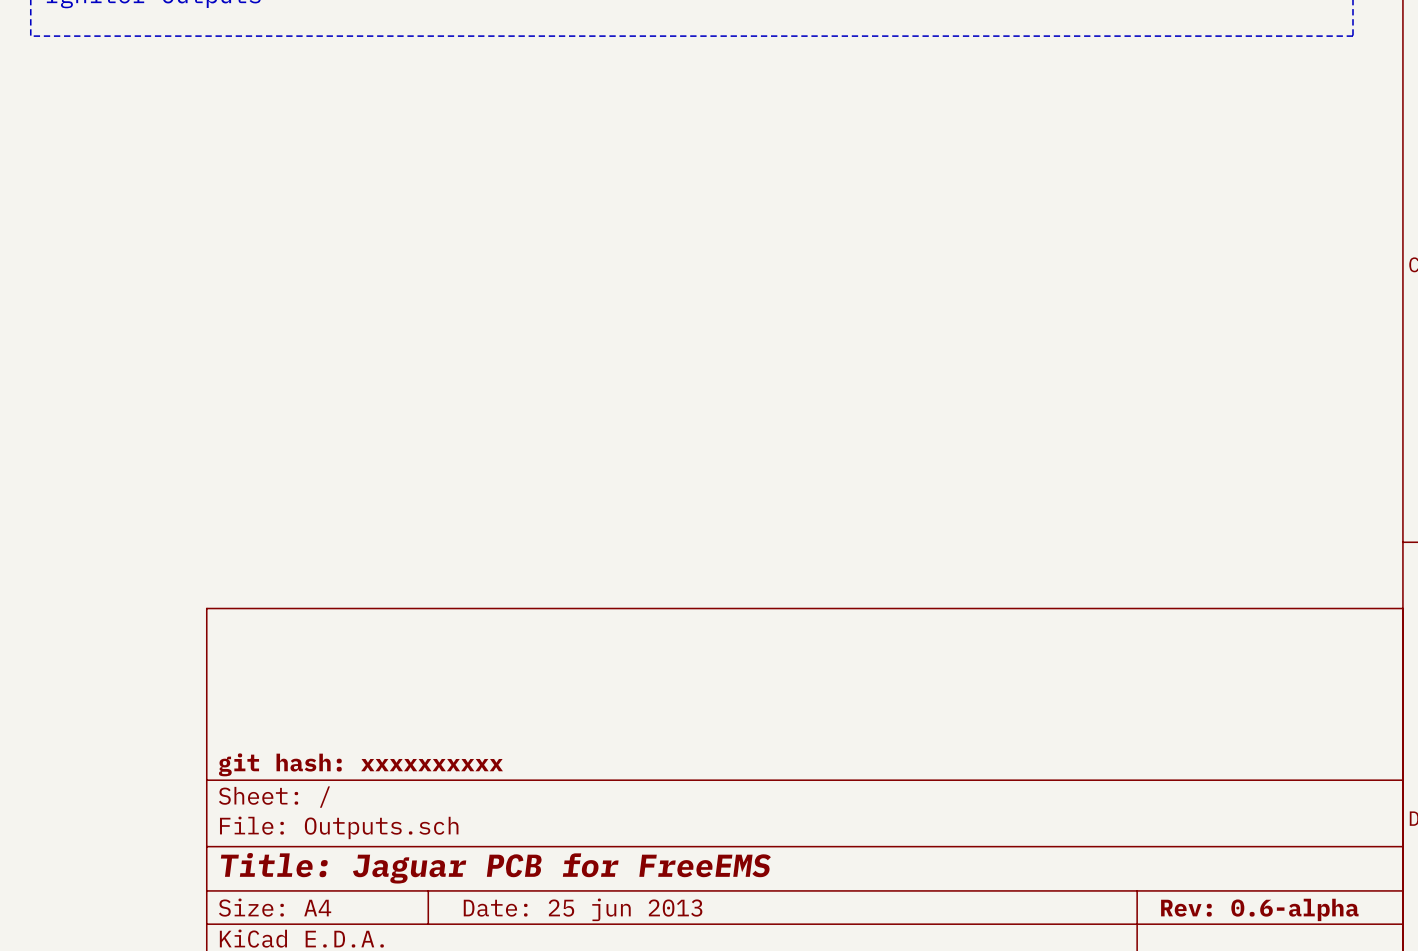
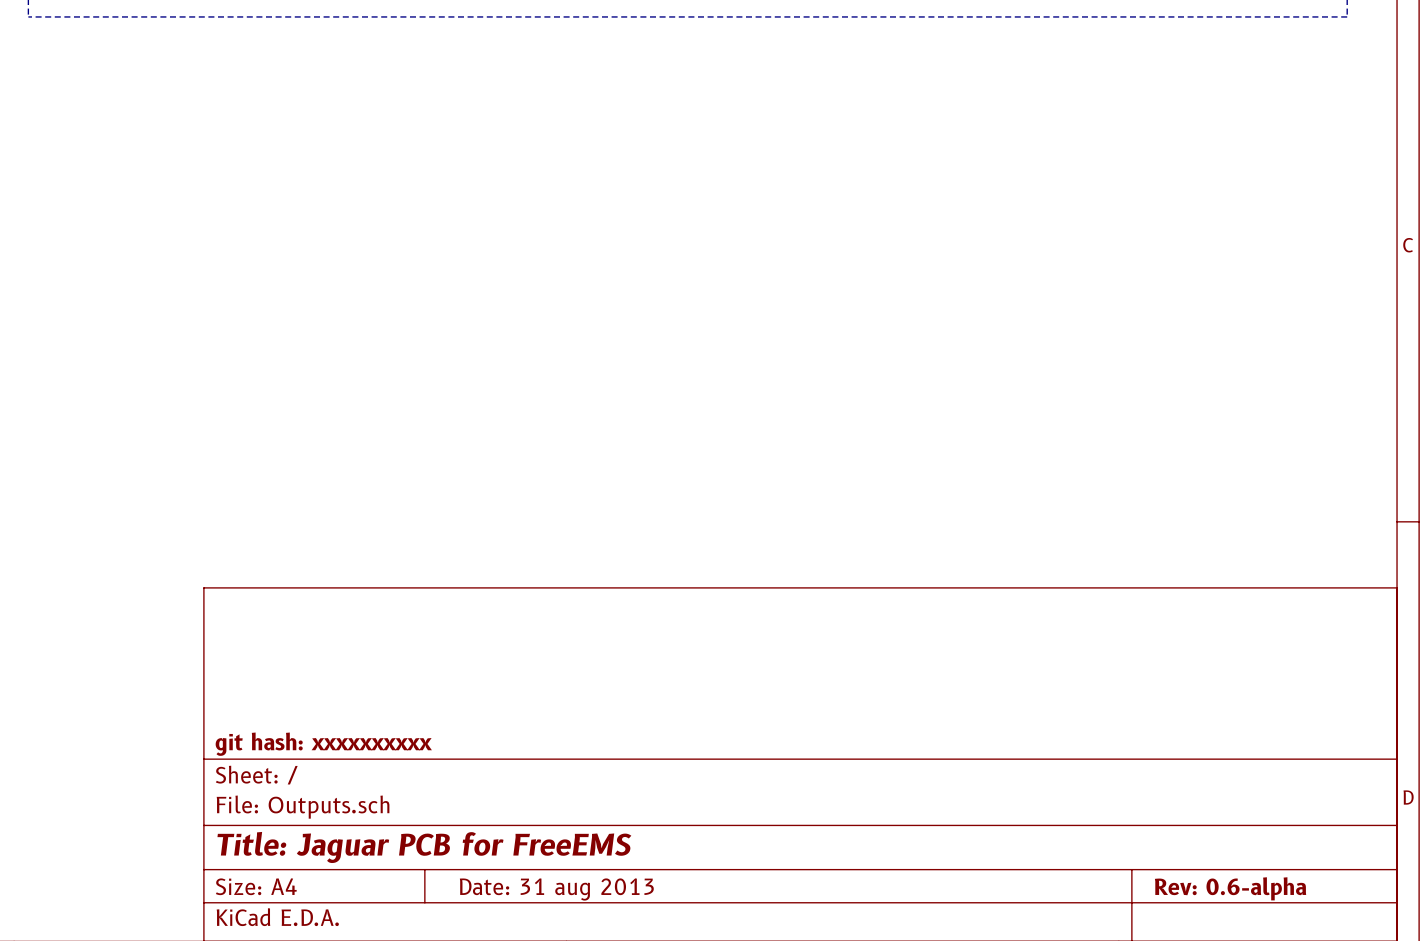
title block: Date: 25 jun 2013 (583, 909) -> Date: 31 aug 2013 (556, 889)

